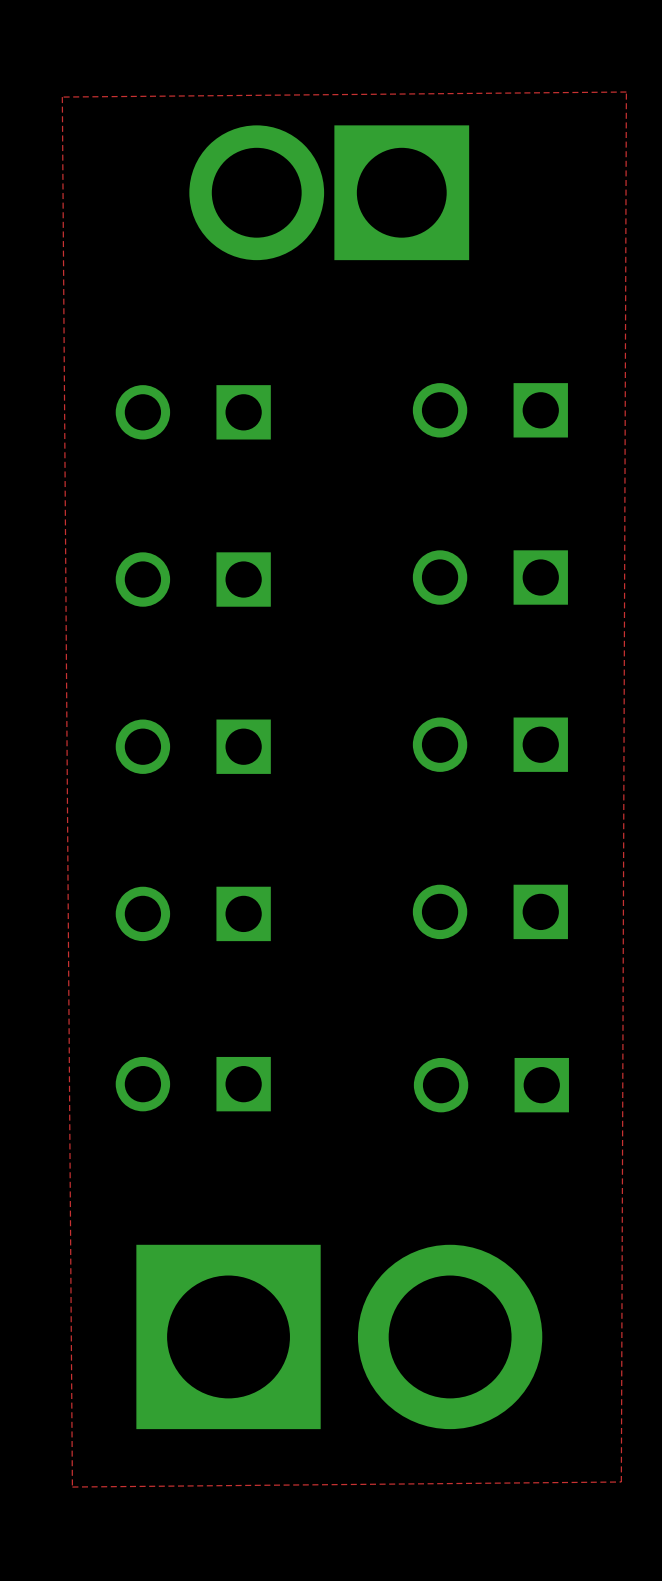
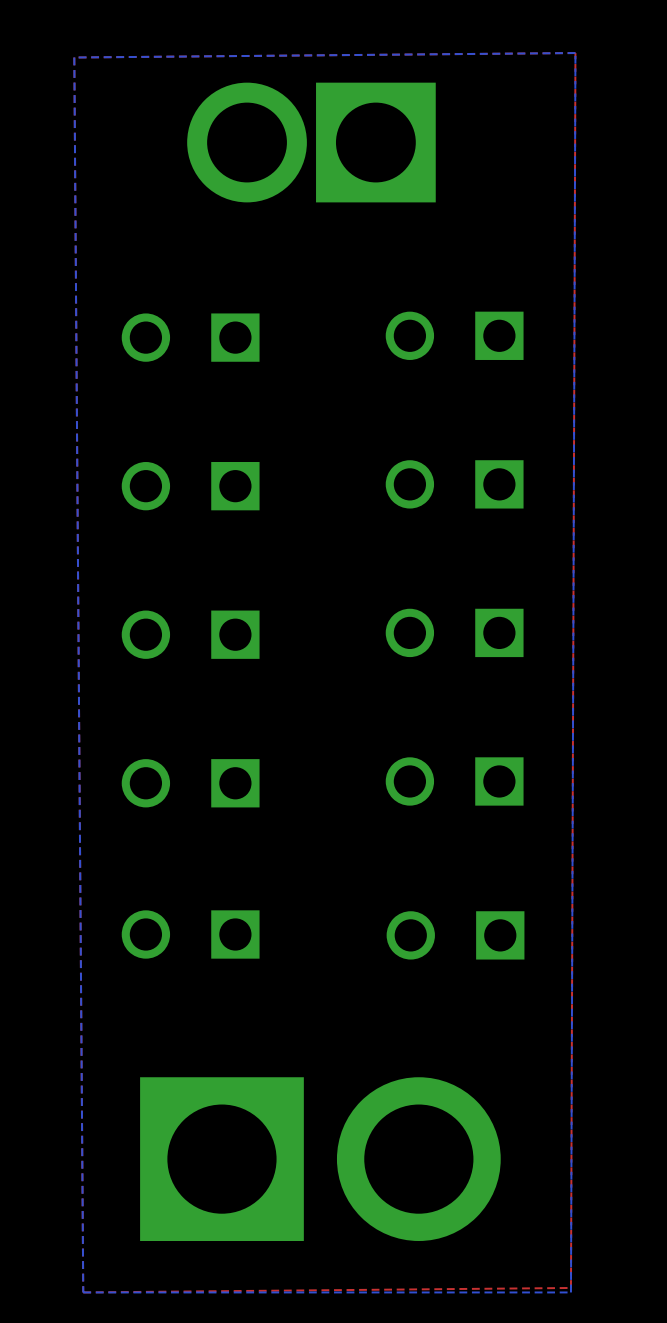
bottom zone outline: none -> (575, 53) (74, 57) (83, 1292) (570, 1292) (575, 53)

